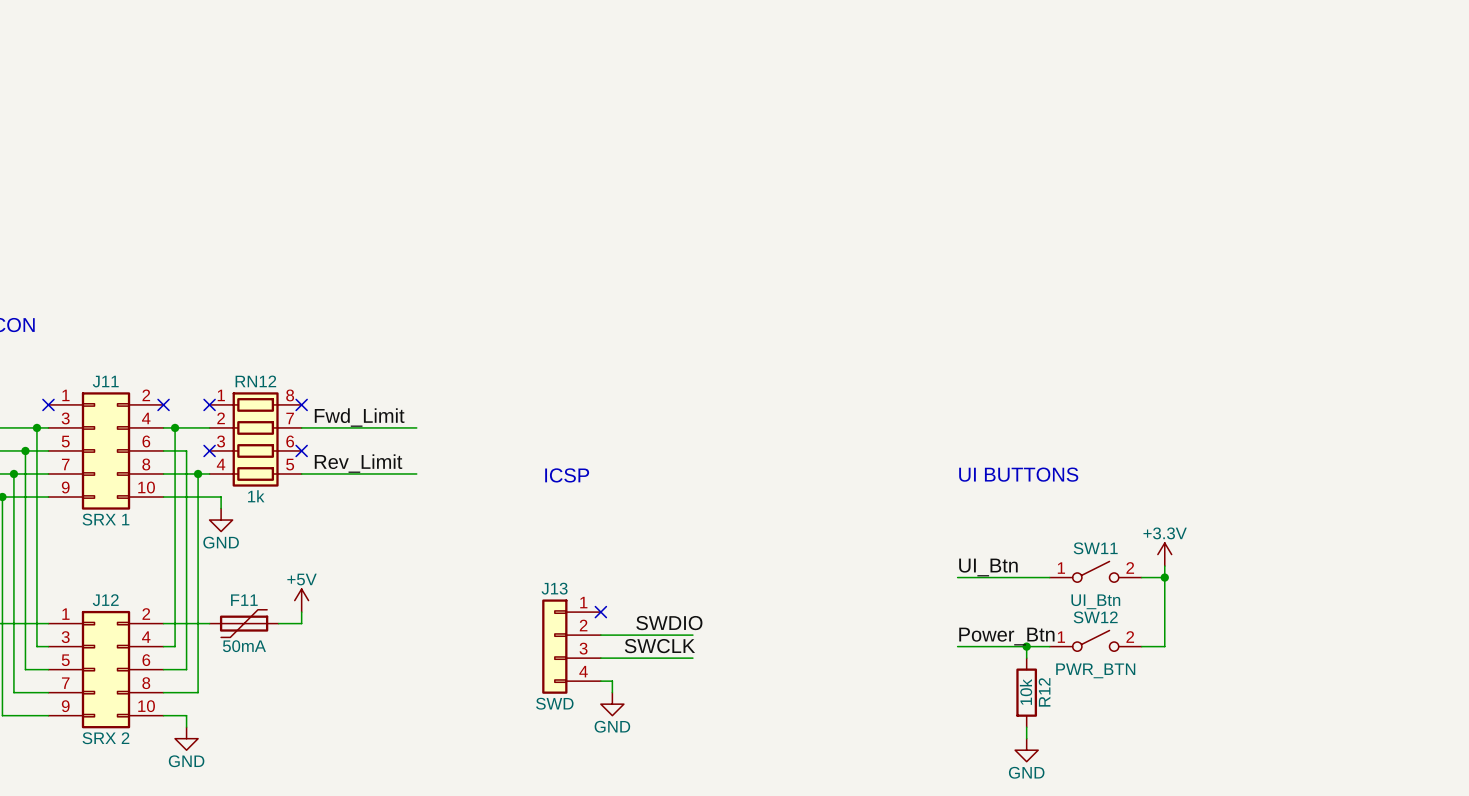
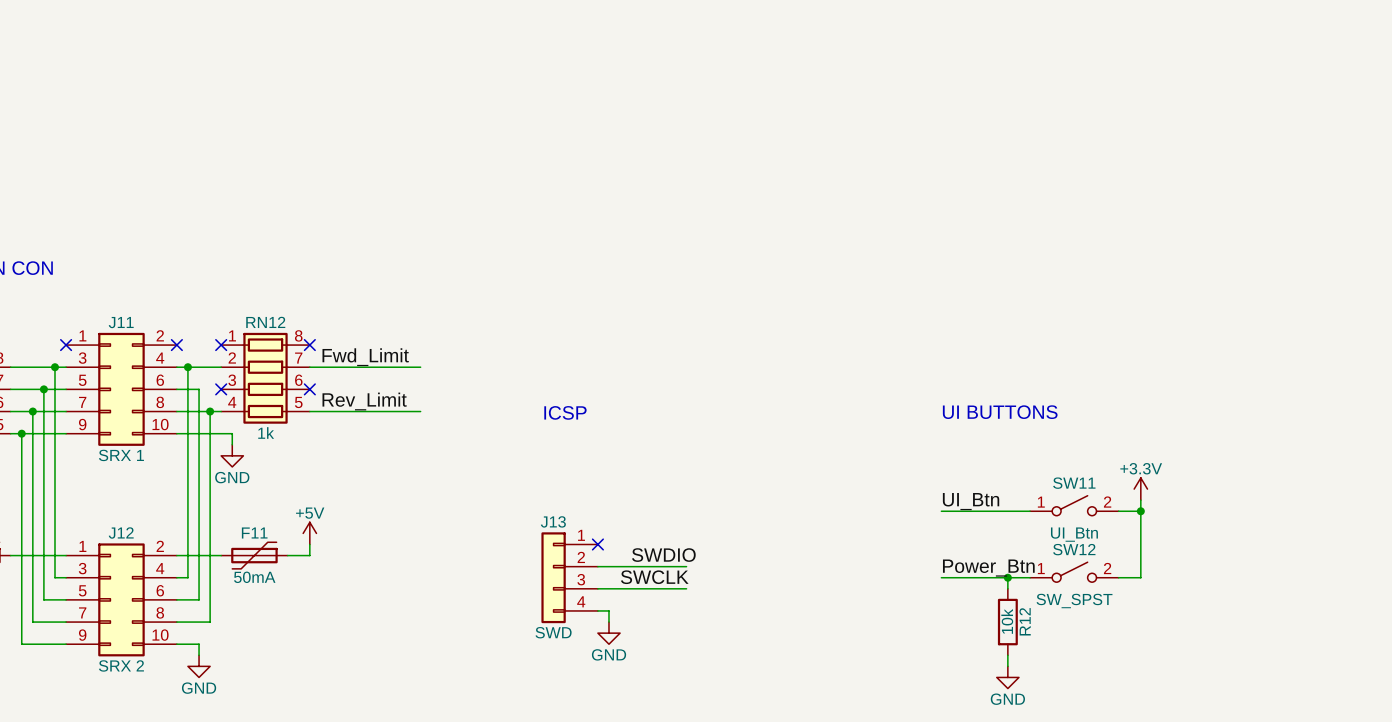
SW12 value: PWR_BTN (1095, 670) -> SW_SPST (1074, 600)

